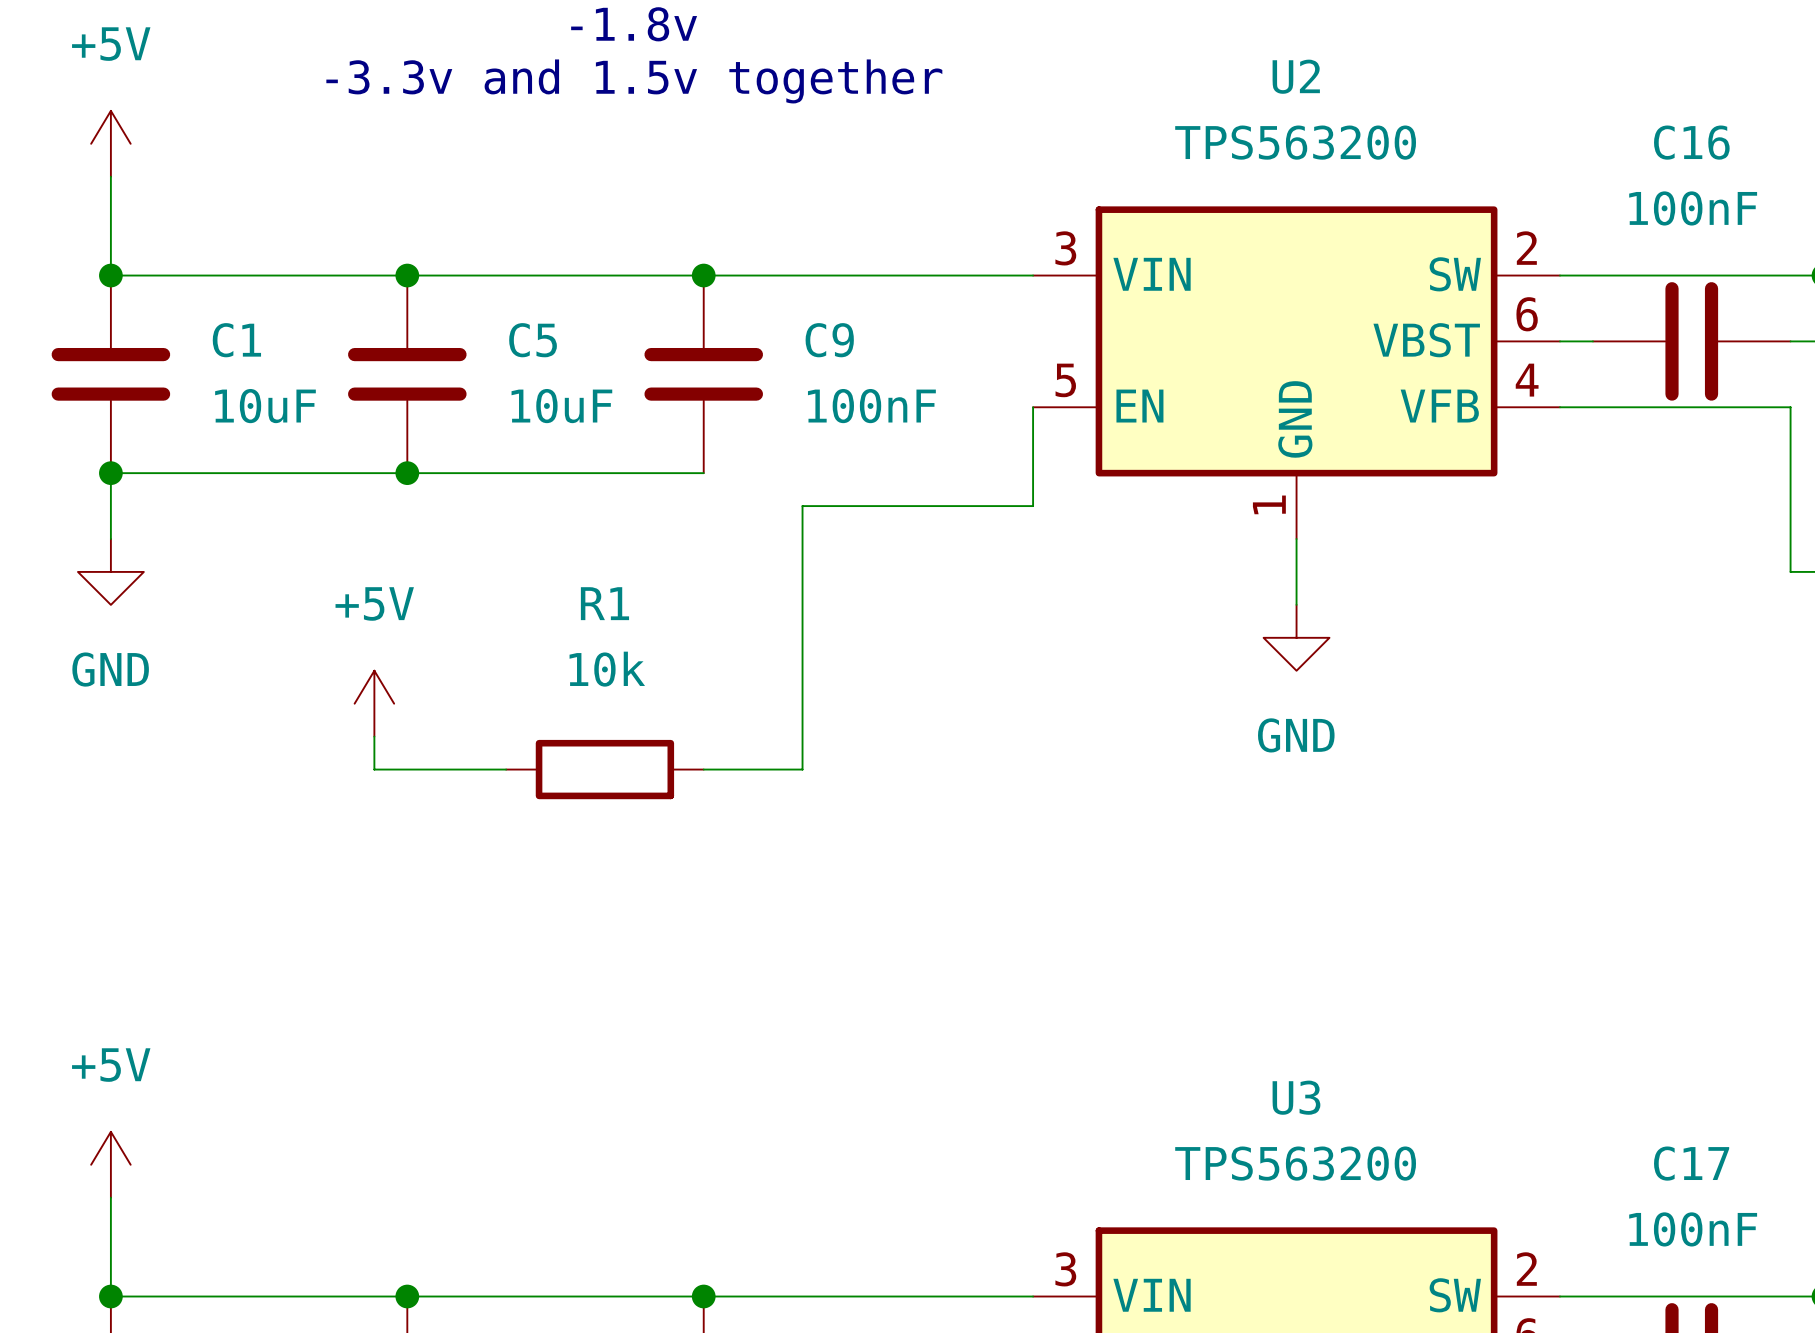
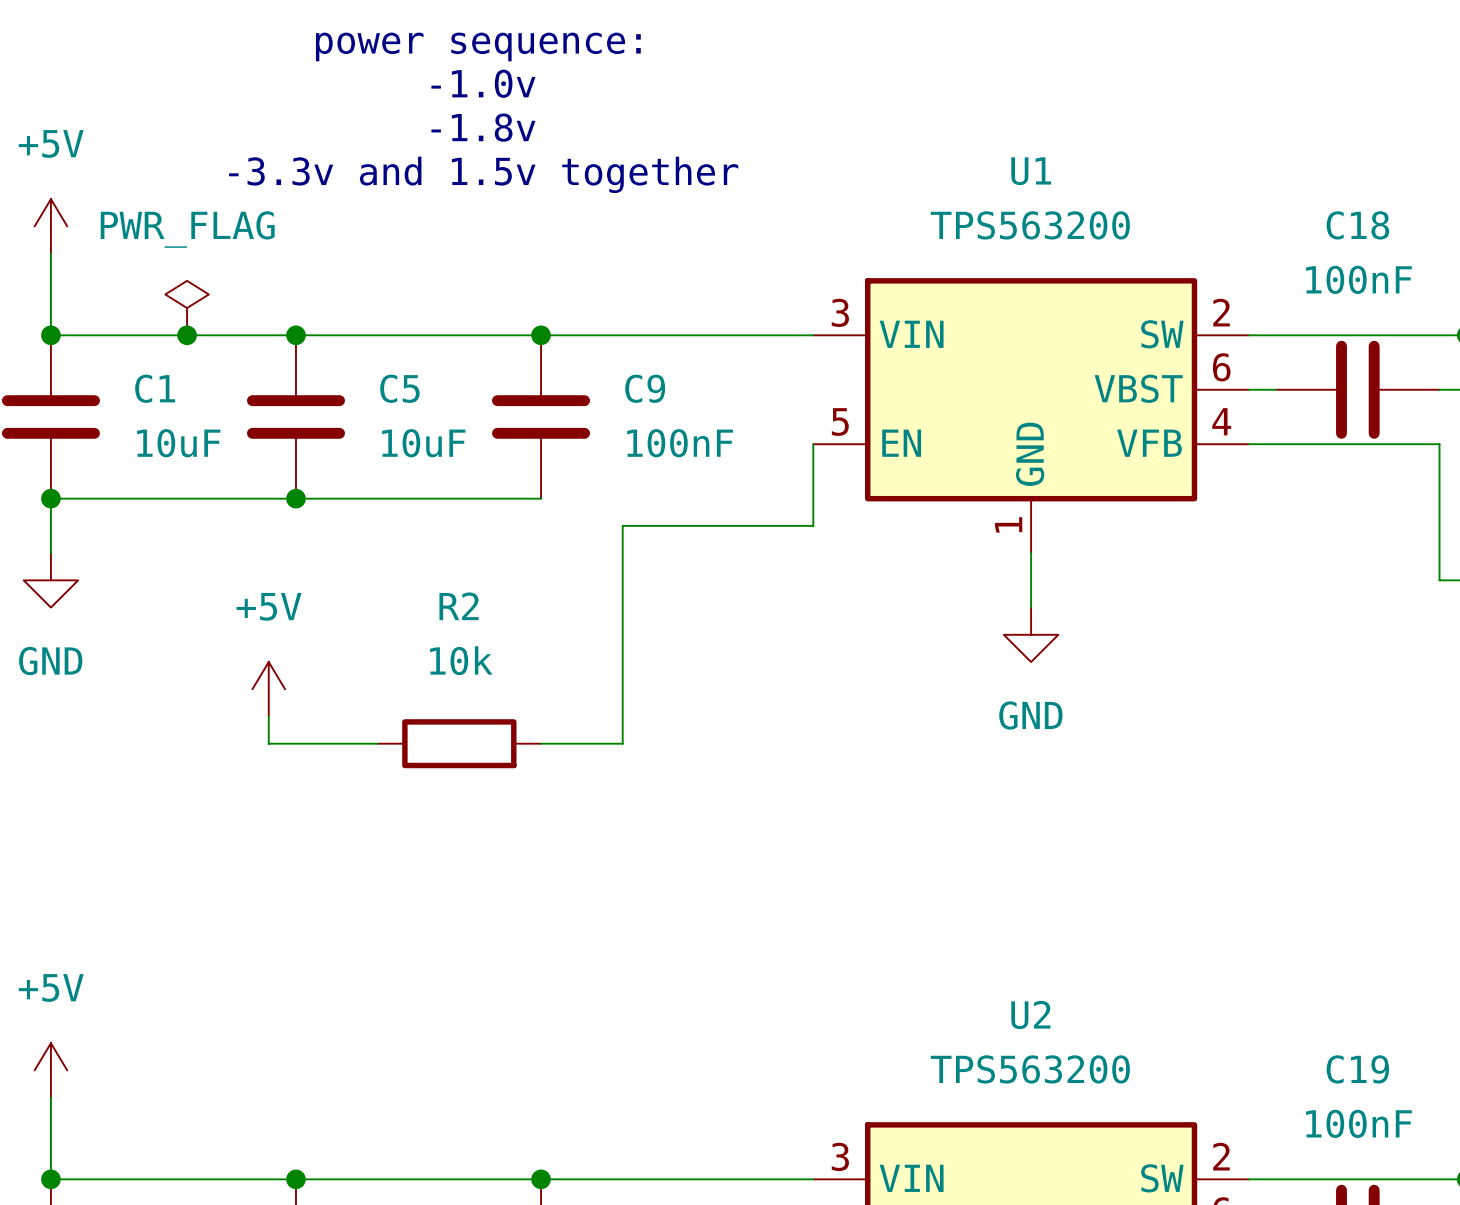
U2 name: U2 (1296, 76) -> U1 (1031, 171)
C16 name: C16 (1691, 142) -> C18 (1357, 225)
power symbol: none -> PWR_FLAG (187, 308)
junction: none -> (187, 335)
R1 name: R1 (604, 603) -> R2 (459, 606)
U3 name: U3 (1296, 1097) -> U2 (1030, 1014)
C17 name: C17 (1691, 1163) -> C19 (1357, 1069)

